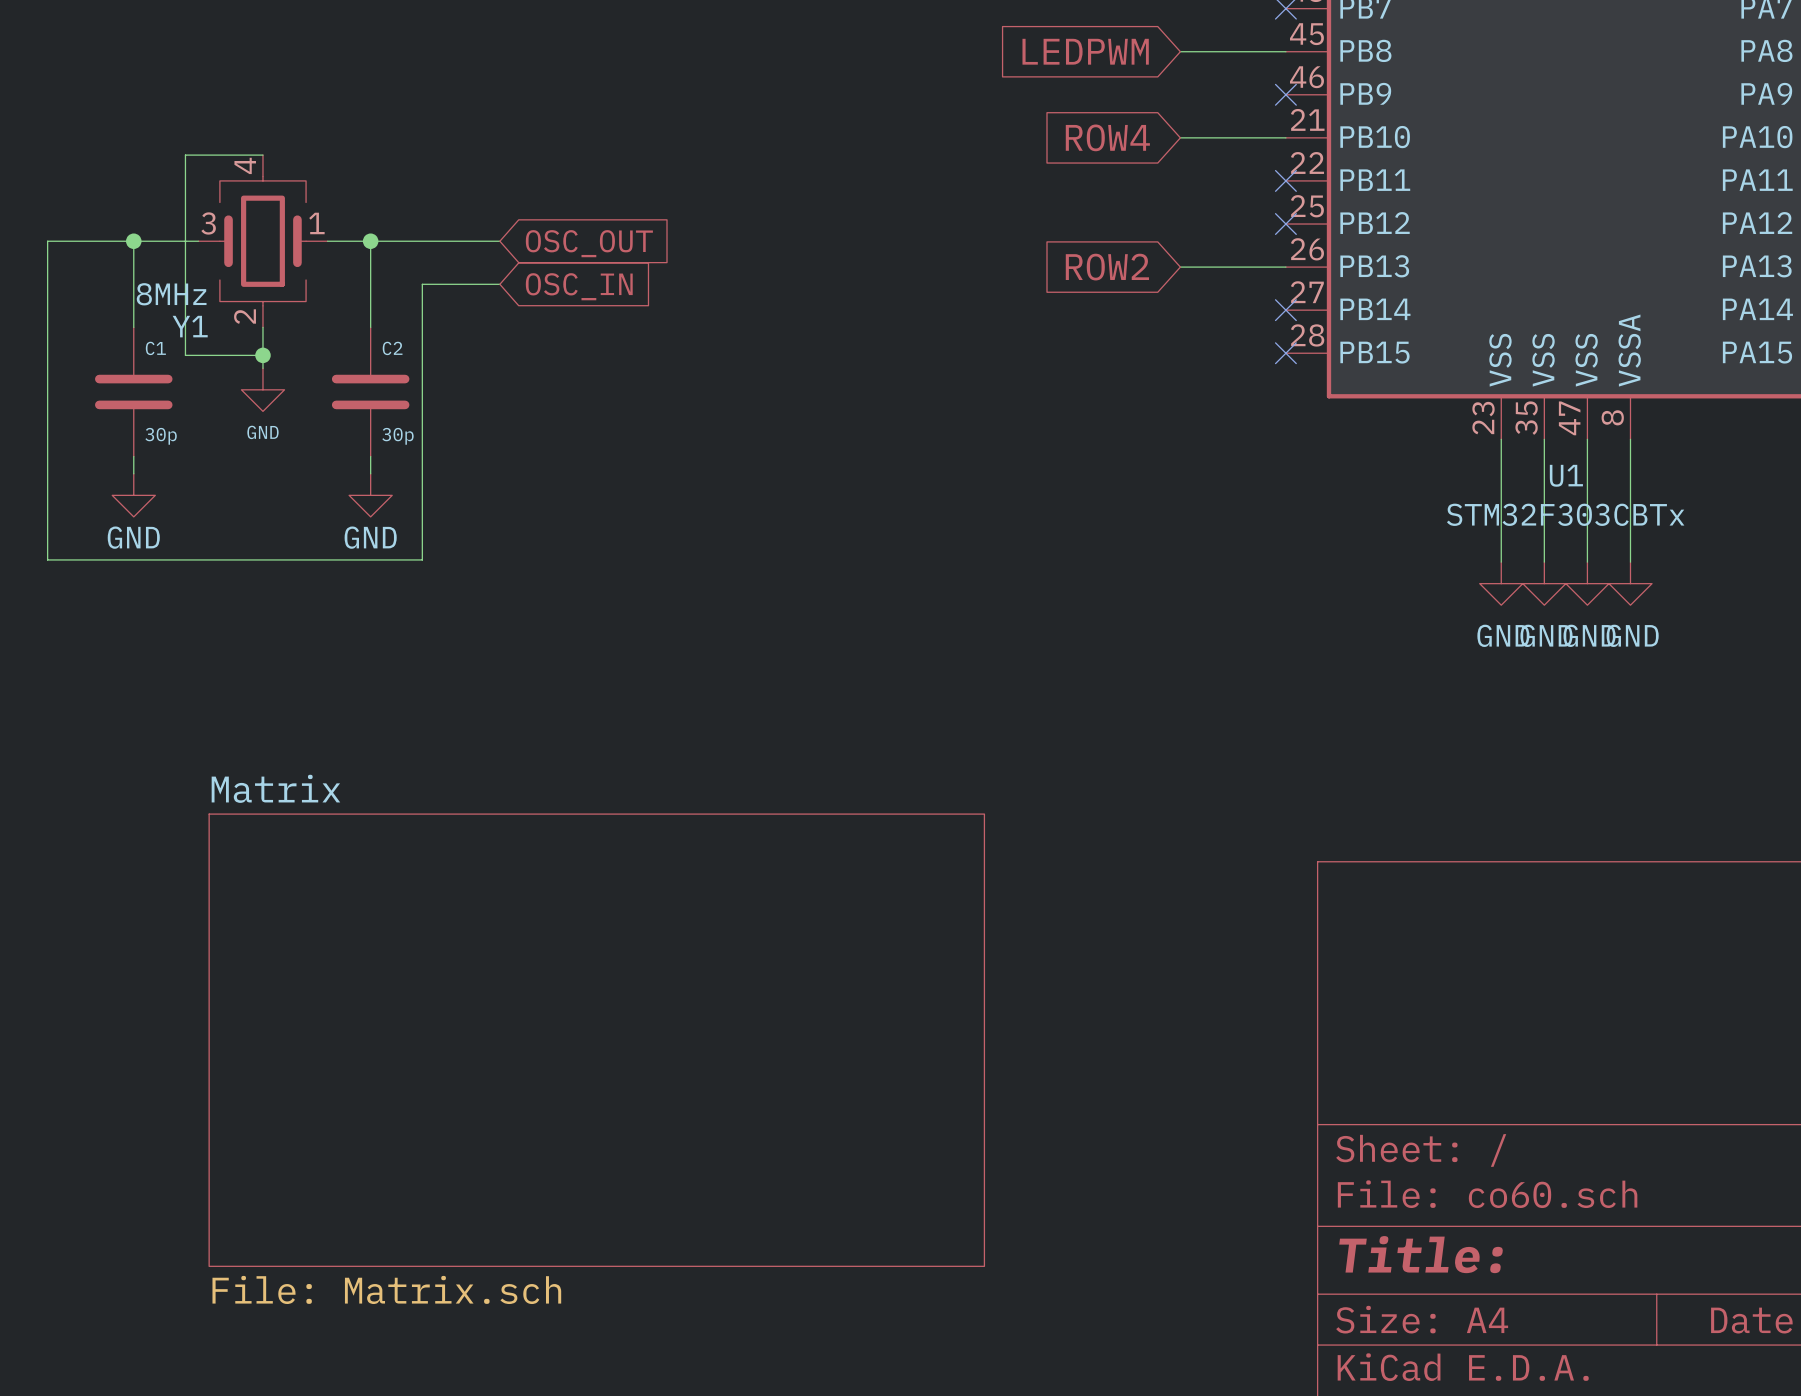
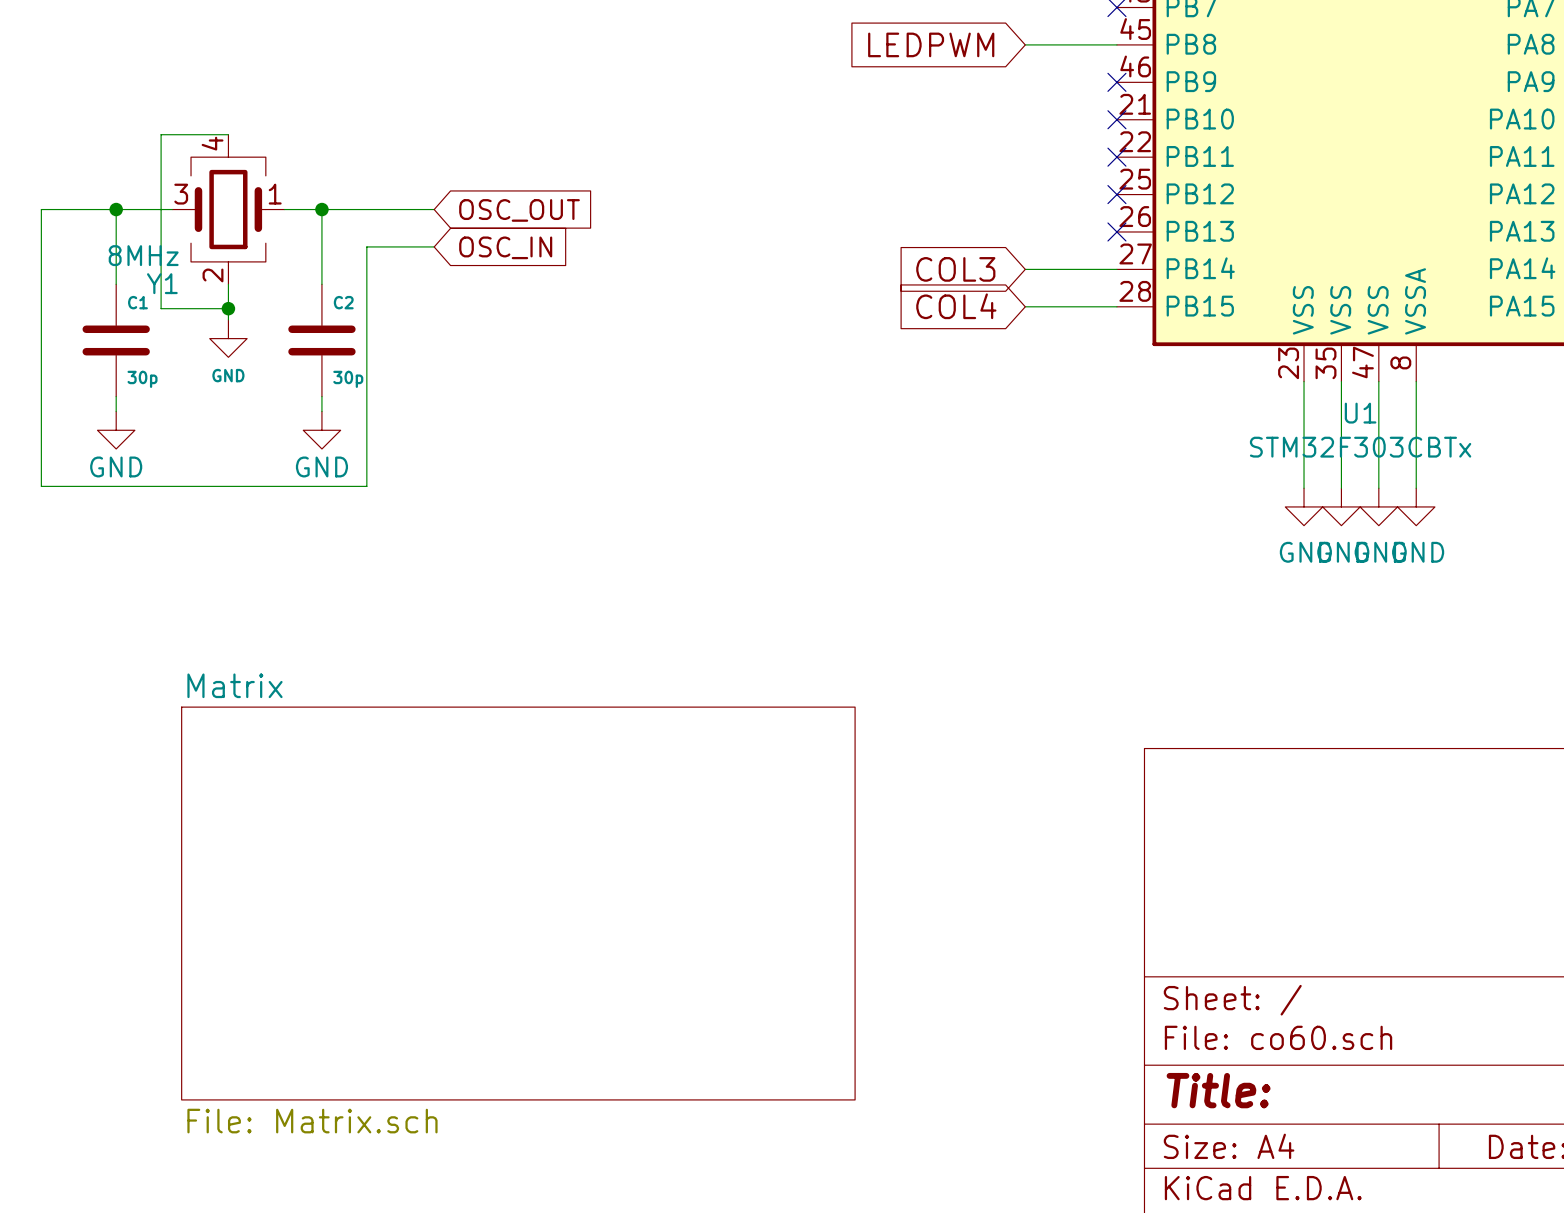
global label: ROW4 (1107, 137) -> none
wire: (1180, 137) (1285, 137) -> (1025, 306) (1116, 306)
no-connect mark: none -> (1116, 119)
global label: ROW2 (1107, 267) -> none
wire: (1180, 267) (1285, 267) -> (1025, 269) (1116, 269)
no-connect mark: none -> (1116, 231)
global label: none -> COL3 (955, 269)
no-connect mark: (1285, 310) -> none
global label: none -> COL4 (956, 306)
no-connect mark: (1285, 353) -> none

